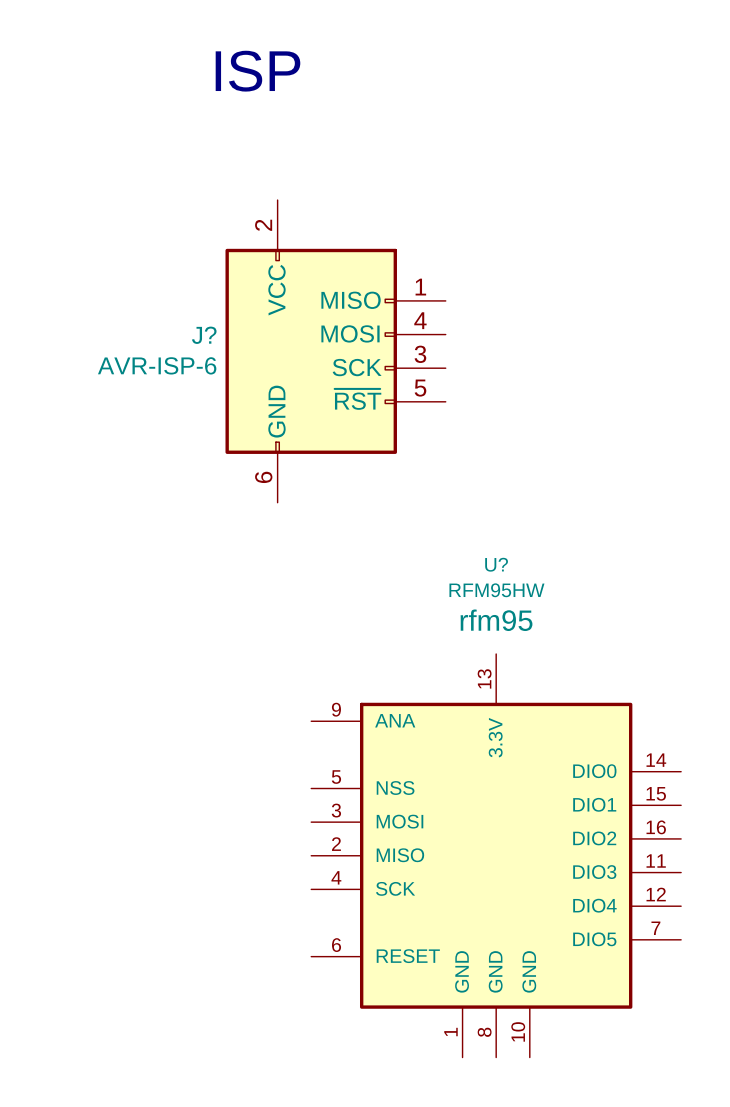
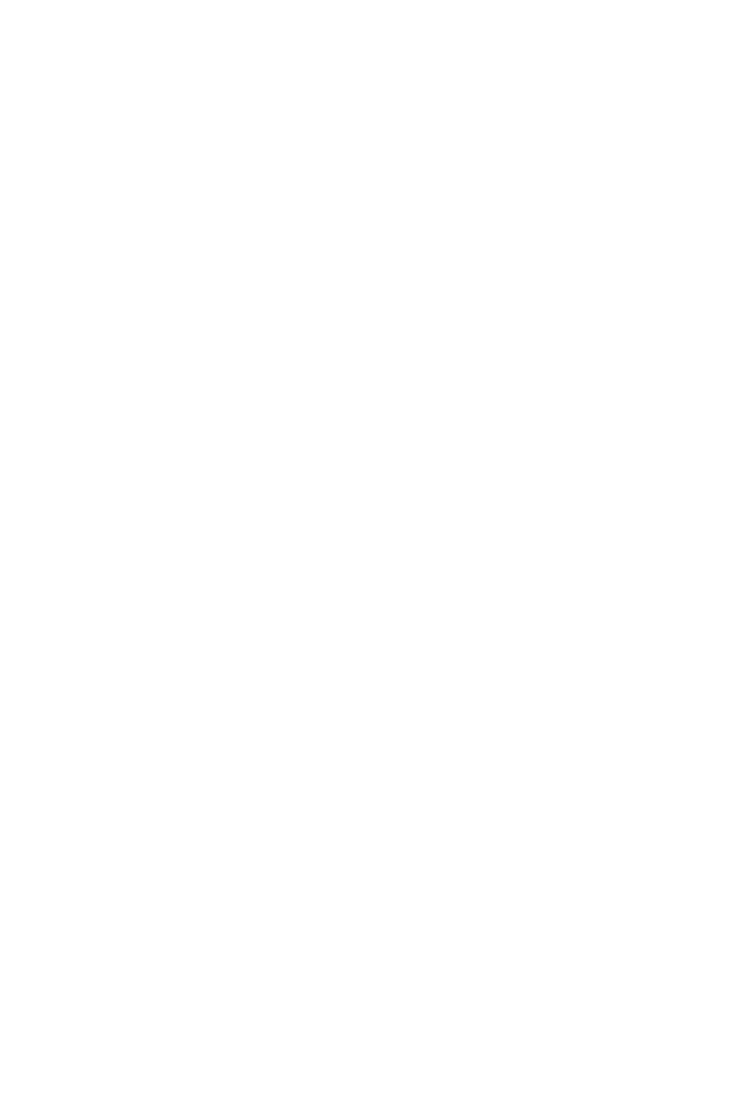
text: ISP (257, 71) -> none
J?: AVR-ISP-6 (335, 351) -> none
U?: RFM95HW (496, 855) -> none

